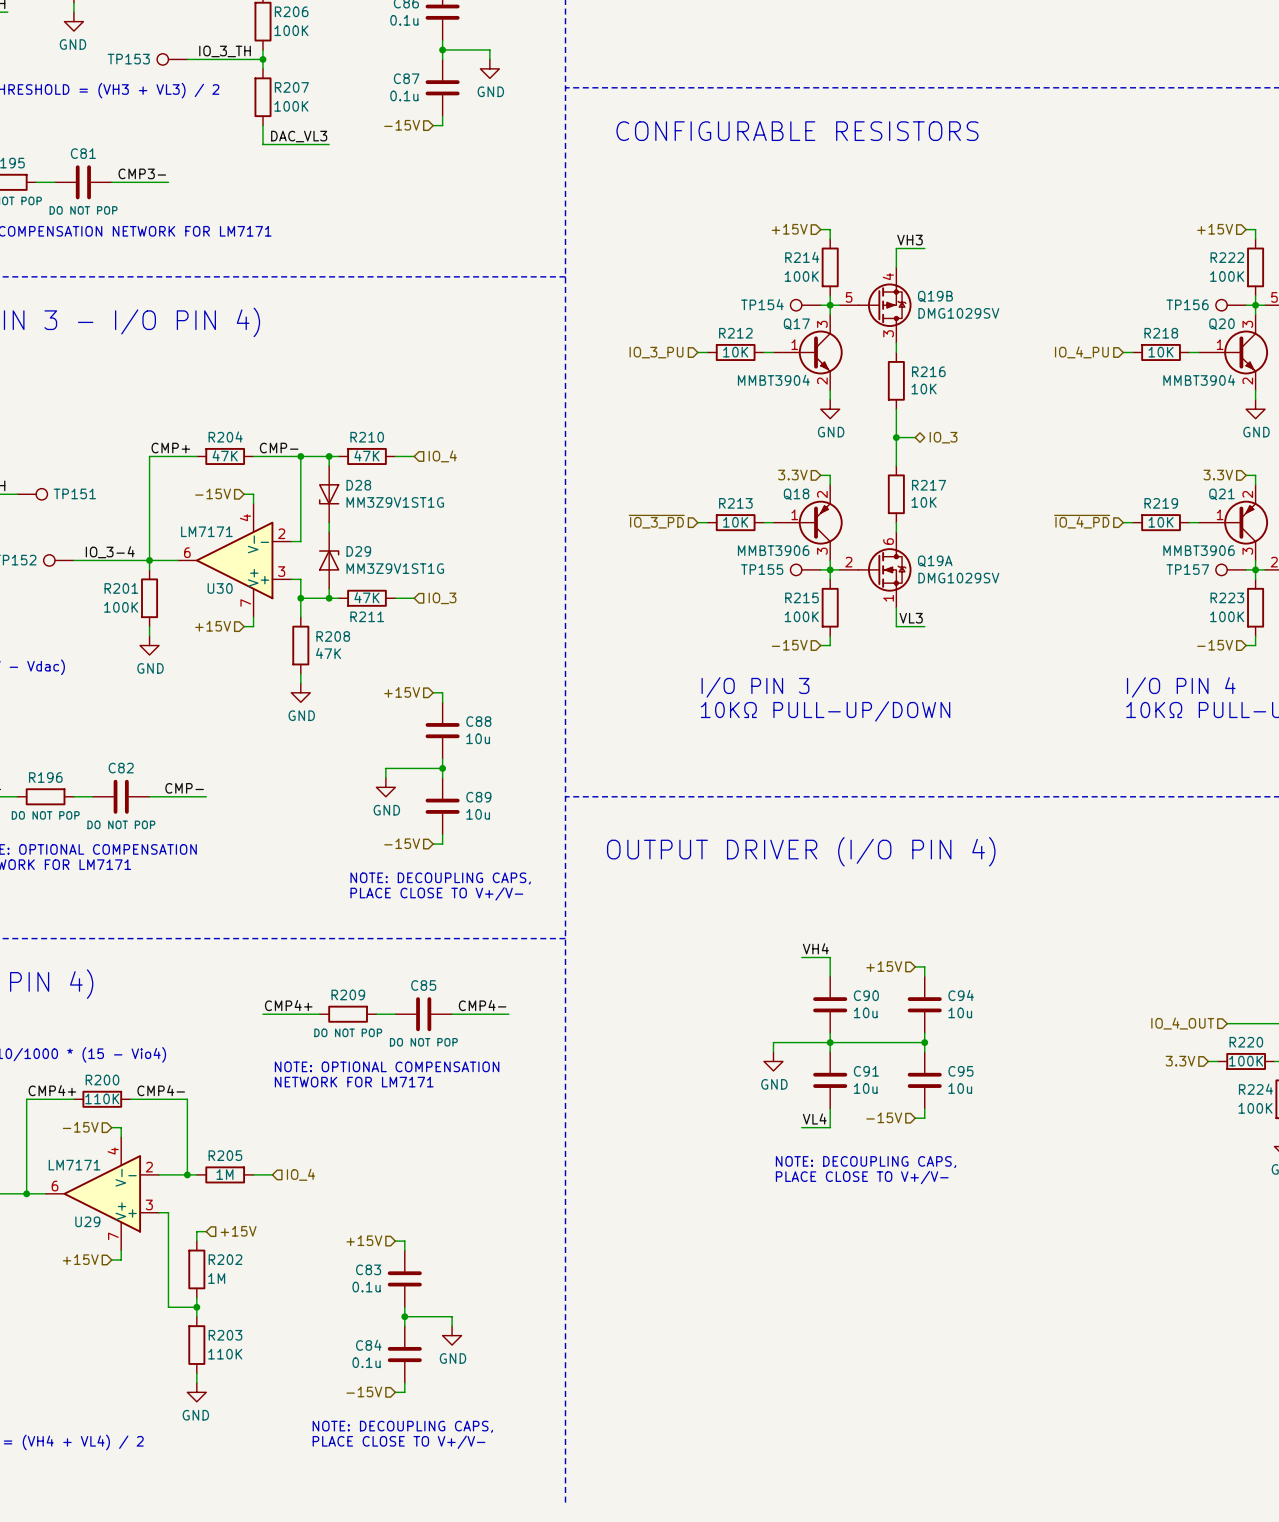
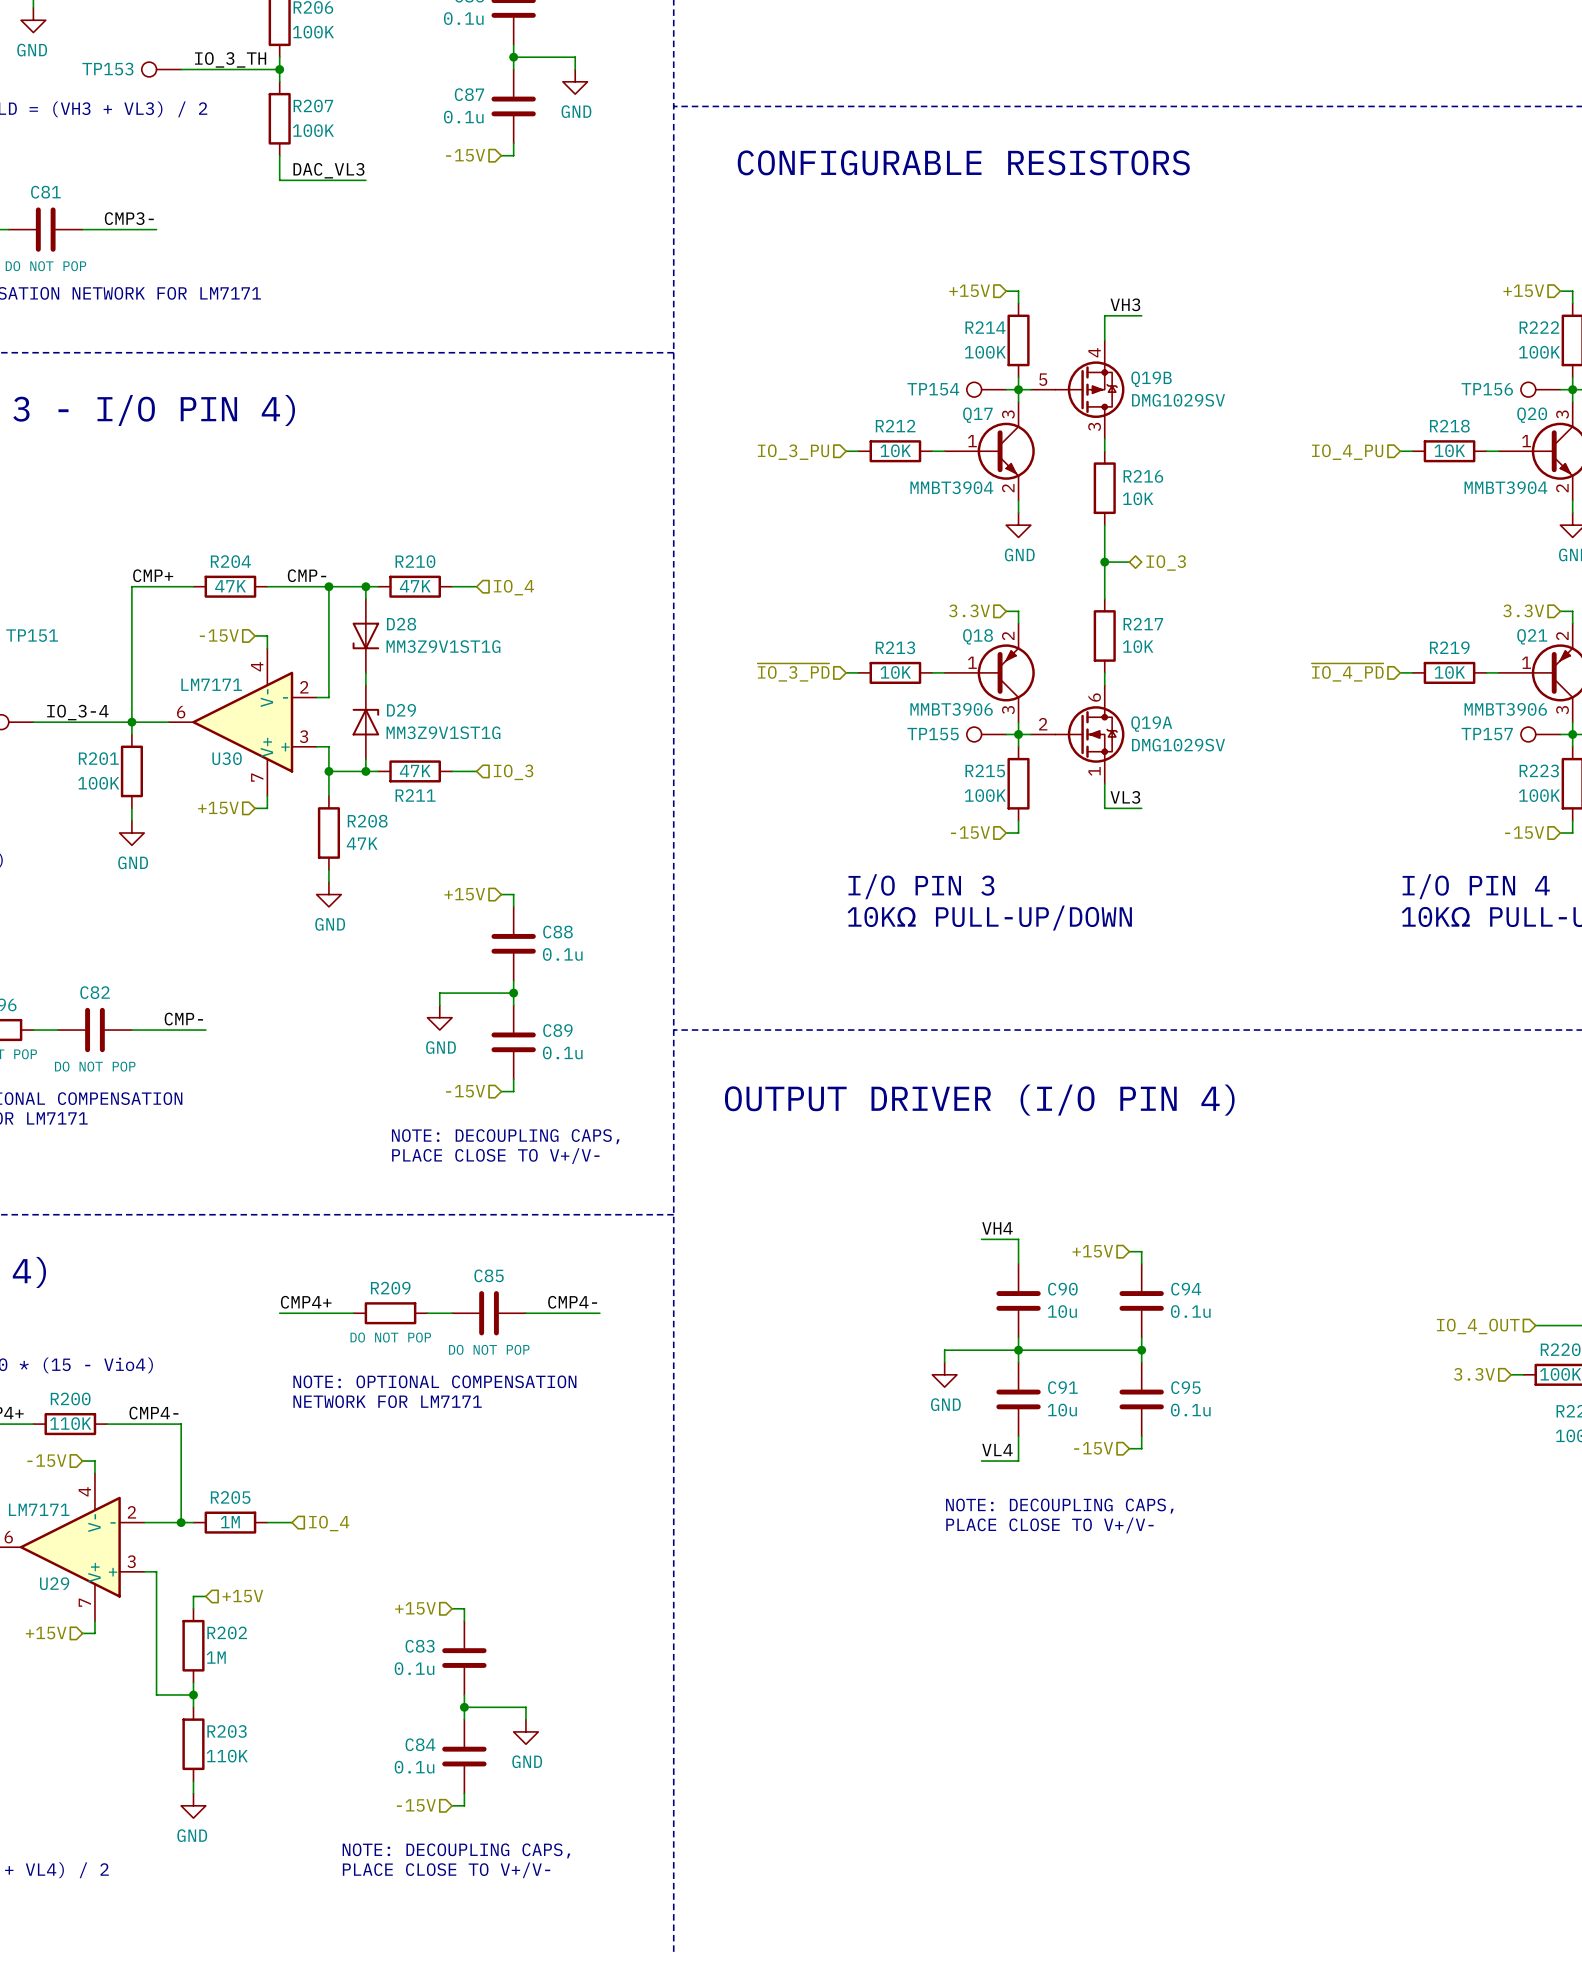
C88 value: 10u (478, 738) -> 0.1u (562, 954)
C89 value: 10u (478, 814) -> 0.1u (562, 1052)
C94 value: 10u (960, 1012) -> 0.1u (1190, 1311)
C95 value: 10u (960, 1088) -> 0.1u (1190, 1410)

